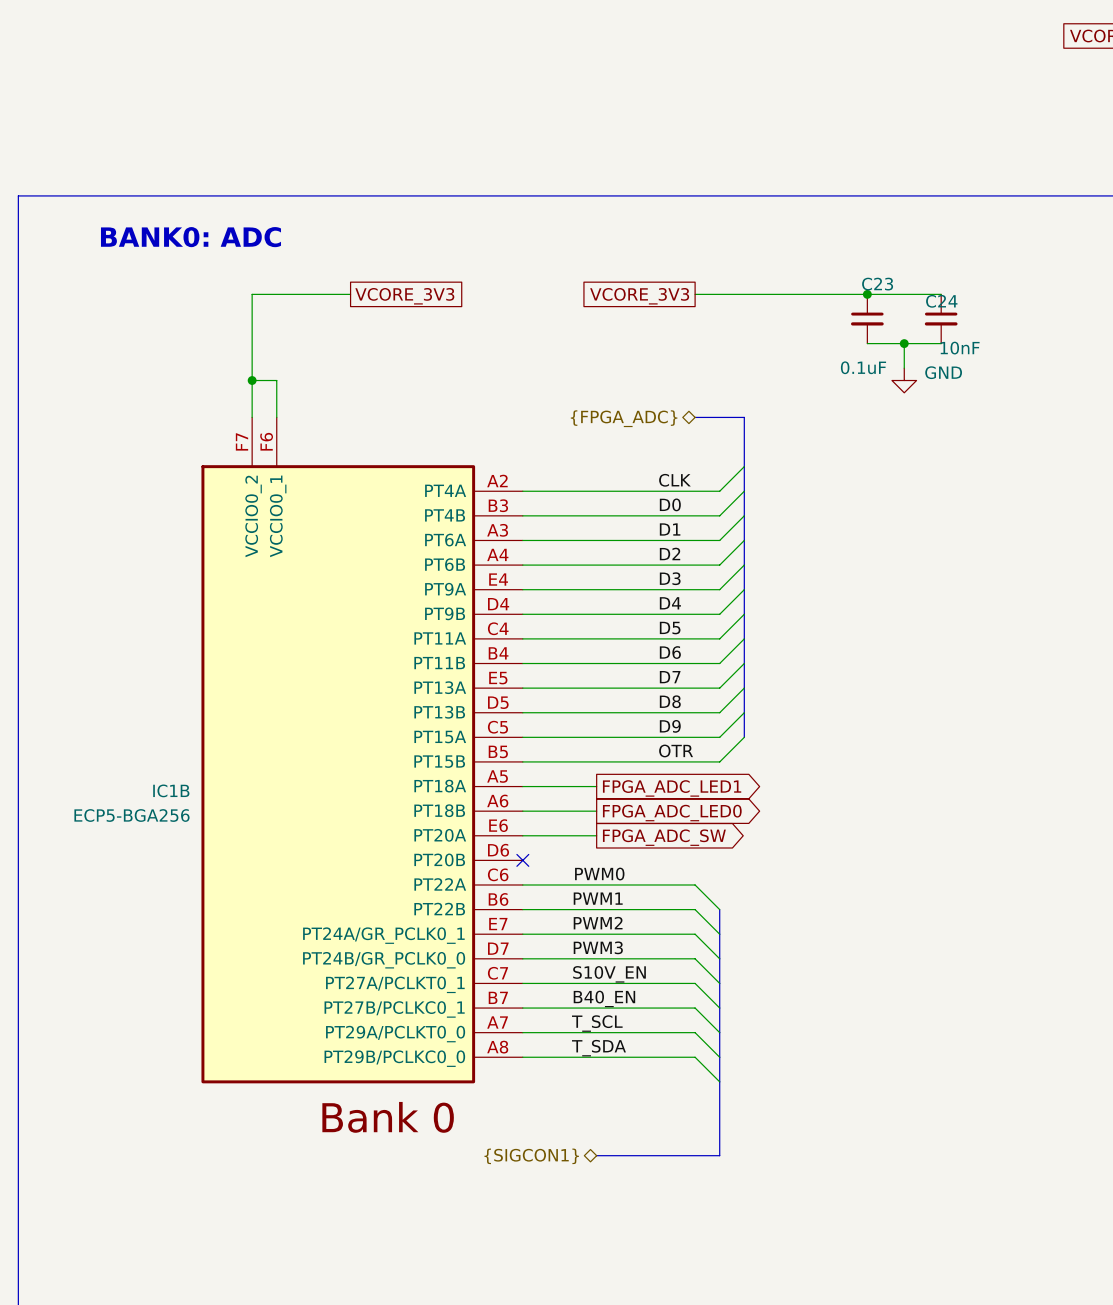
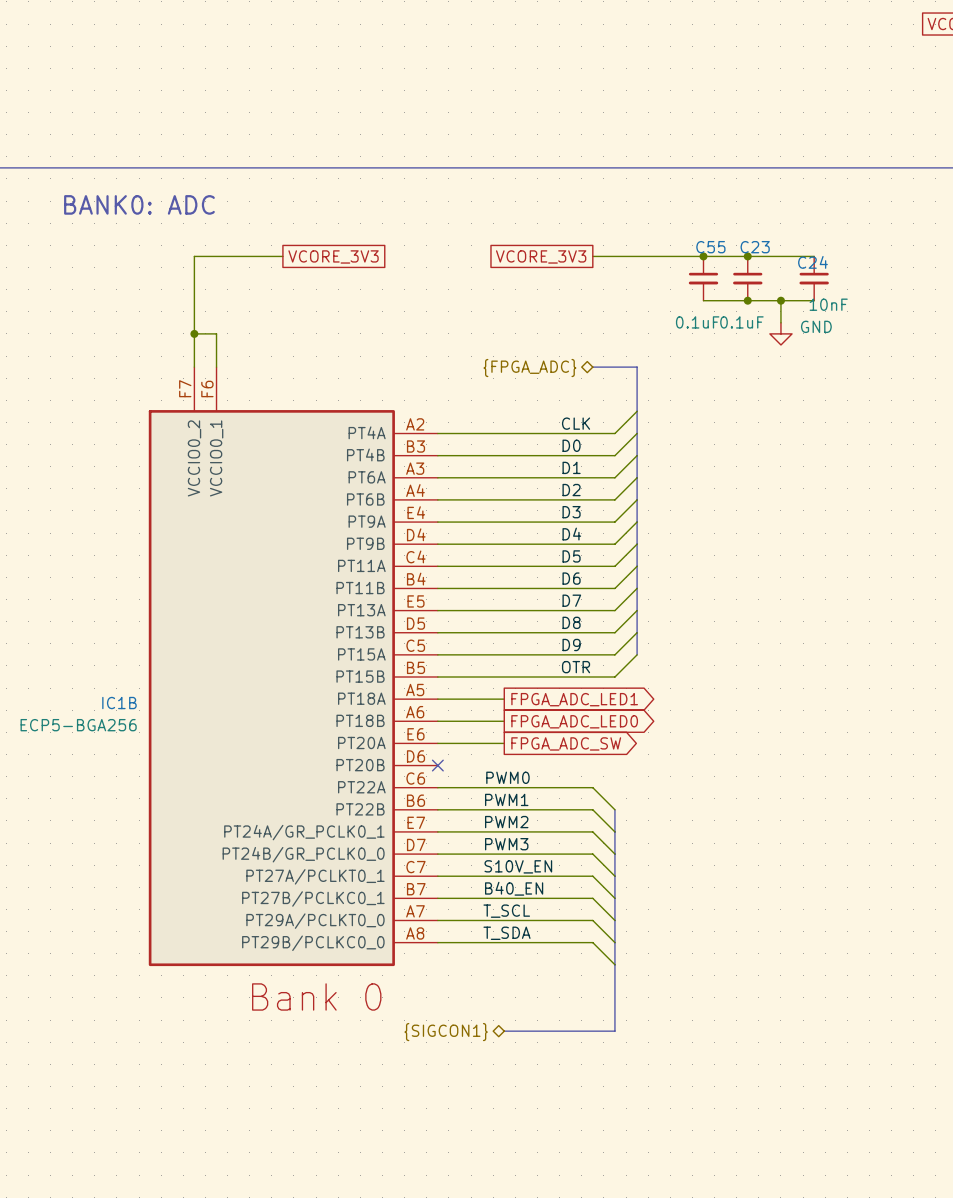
junction: none -> (703, 256)
C55: none -> 0.1uF (703, 278)
wire: none -> (703, 300) (747, 300)
junction: none -> (747, 300)

